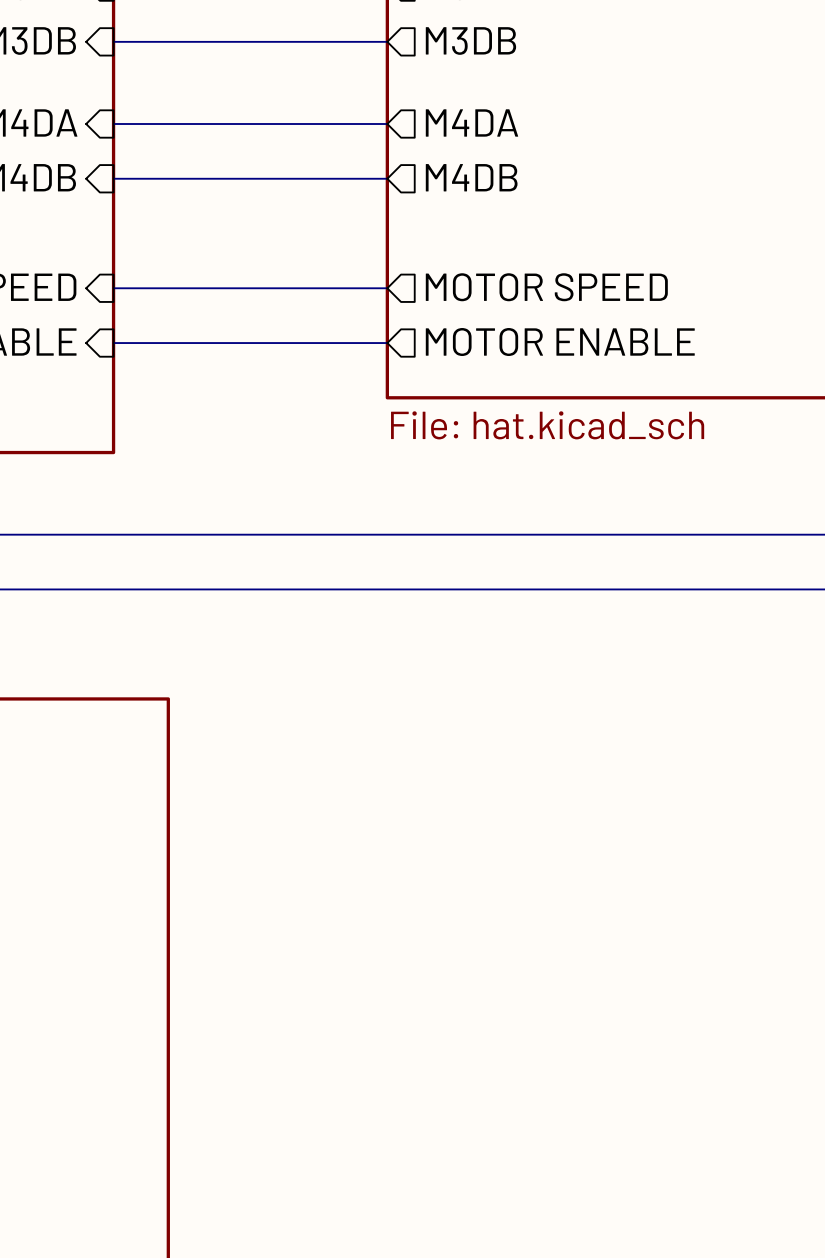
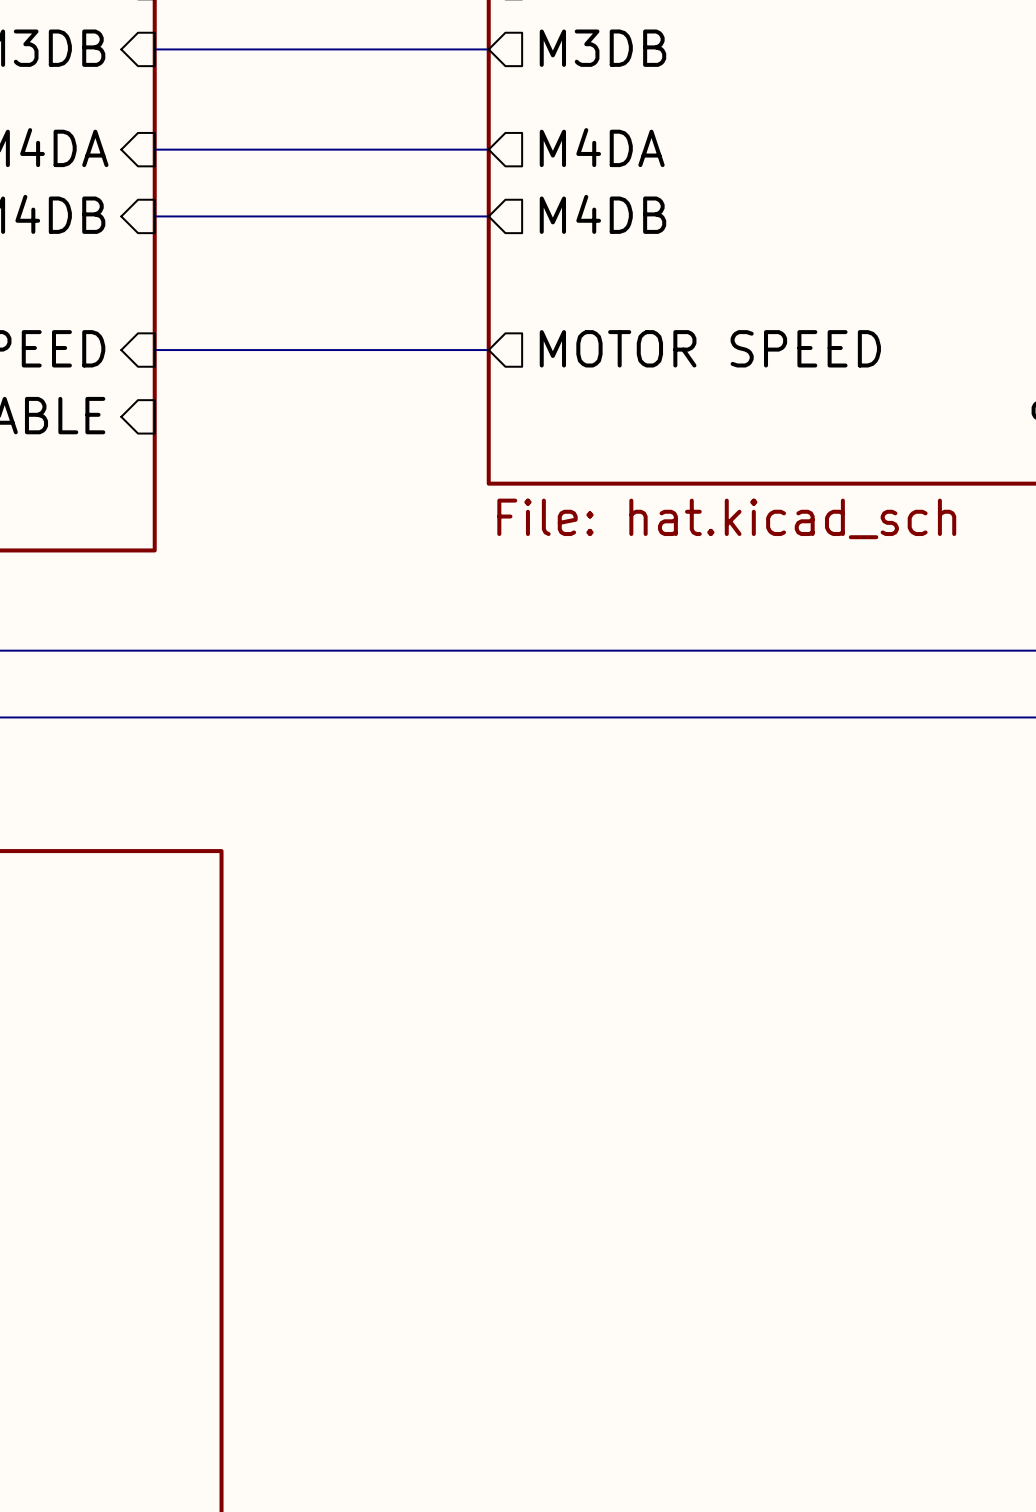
sheet pin: MOTOR ENABLE (560, 342) -> none
wire: (113, 343) (387, 343) -> none

